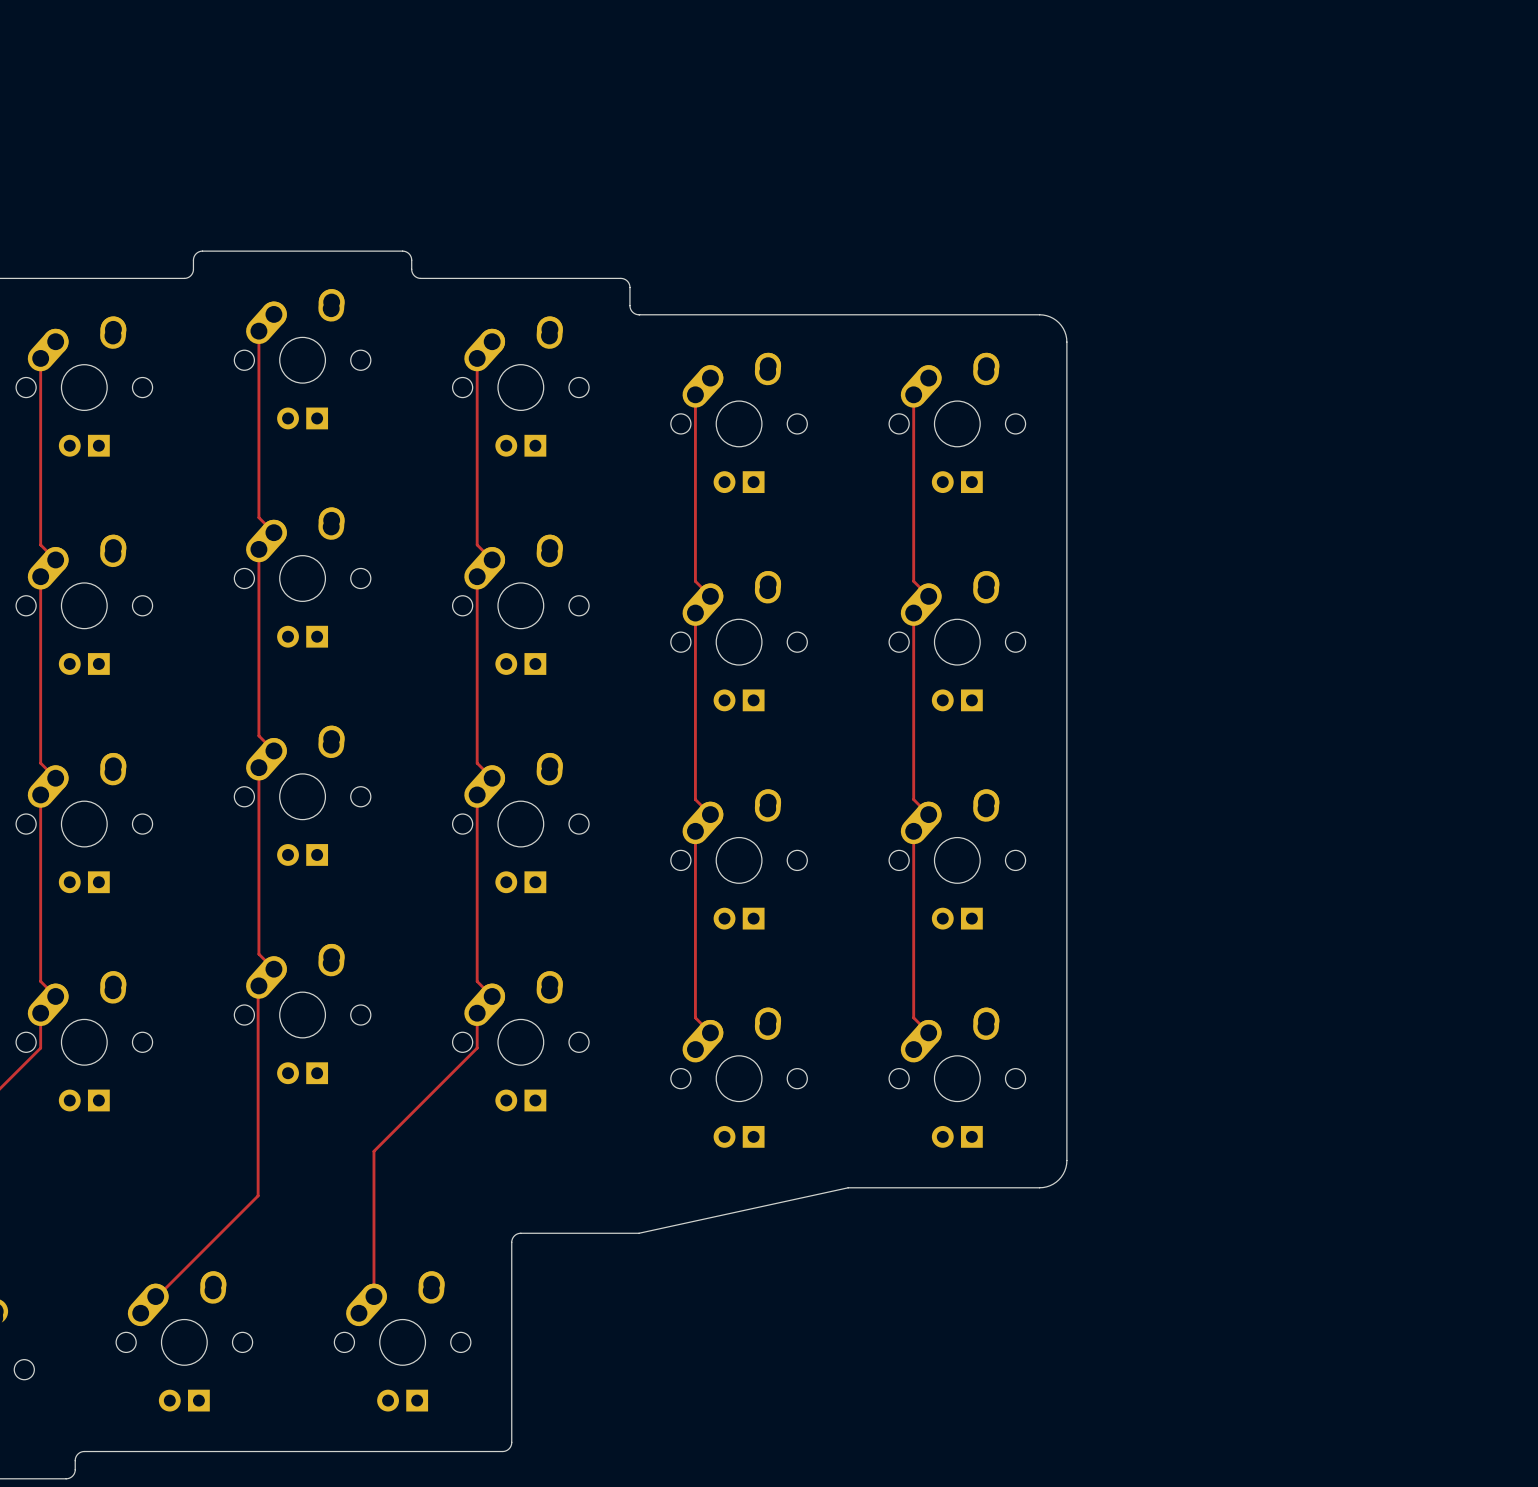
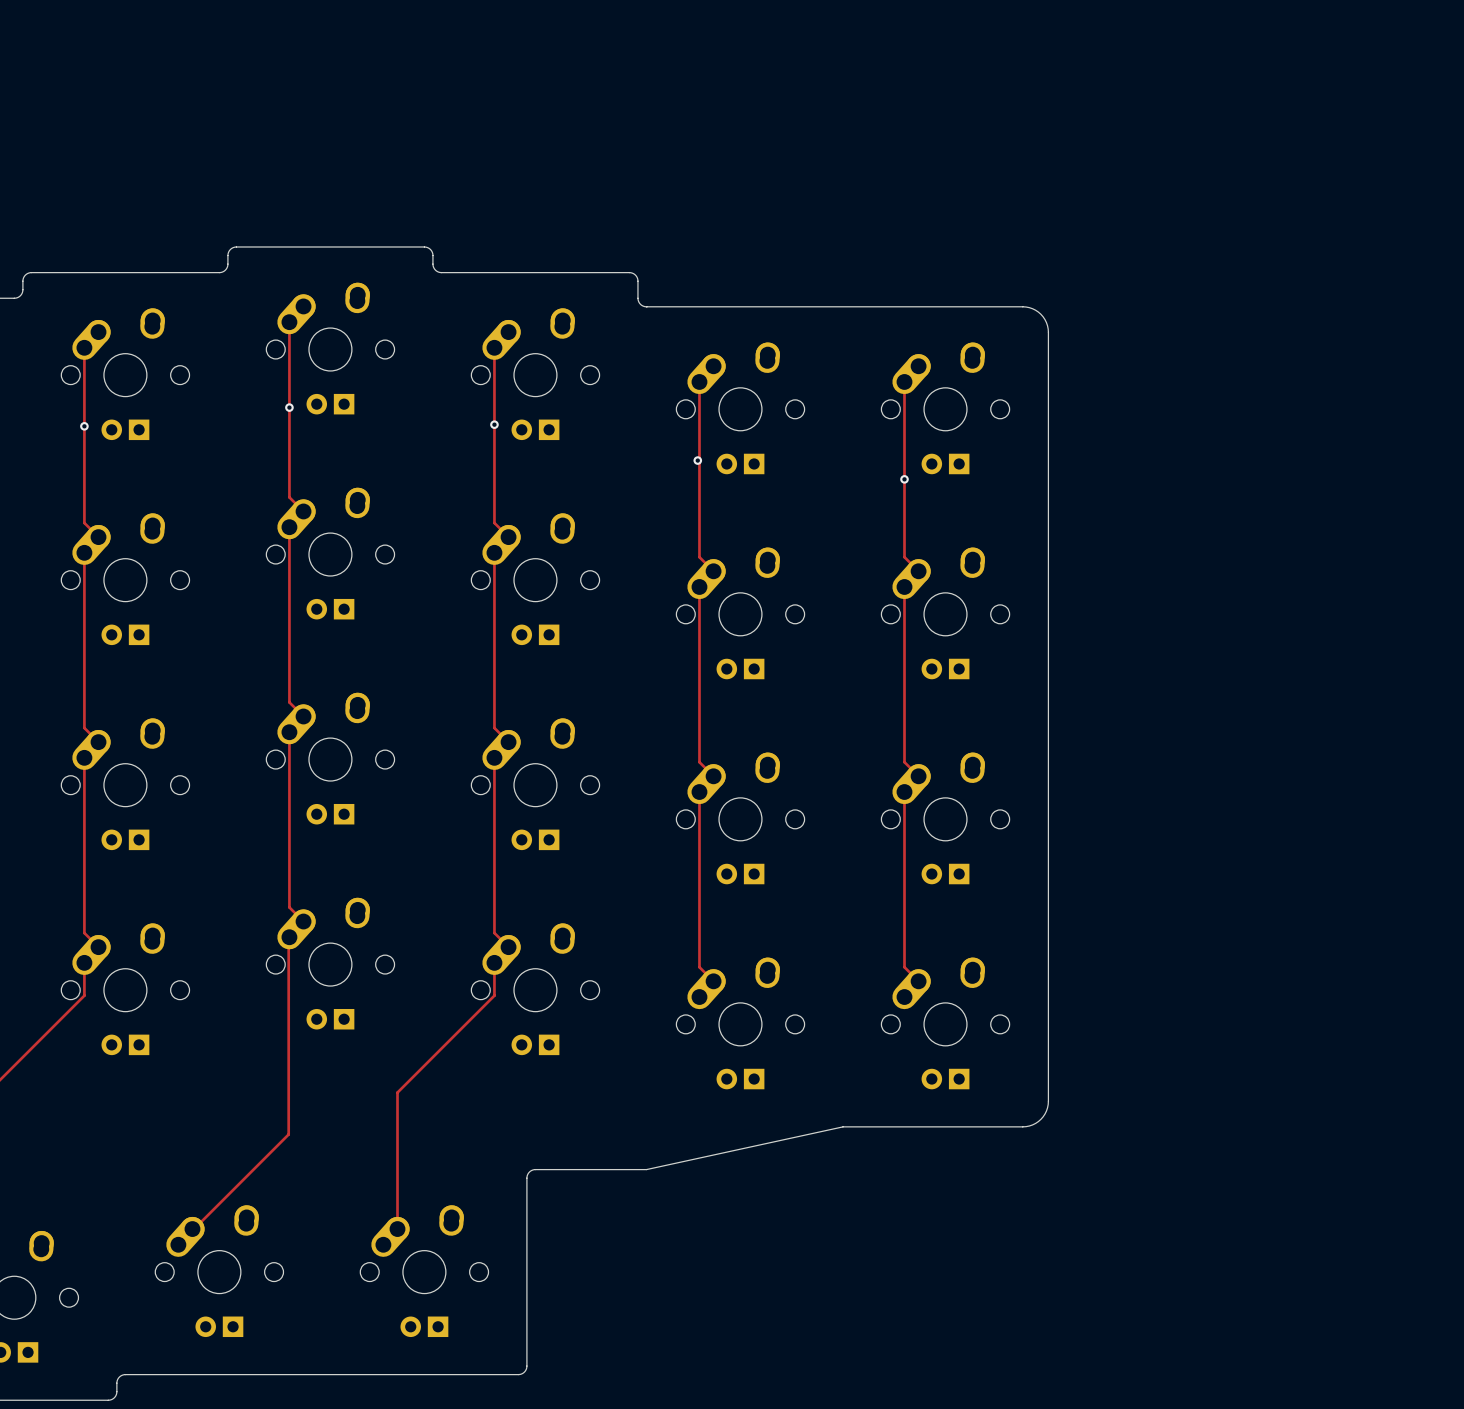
via: none -> (289, 407)
via: none -> (494, 424)
via: none -> (84, 426)
via: none -> (697, 460)
via: none -> (904, 479)

